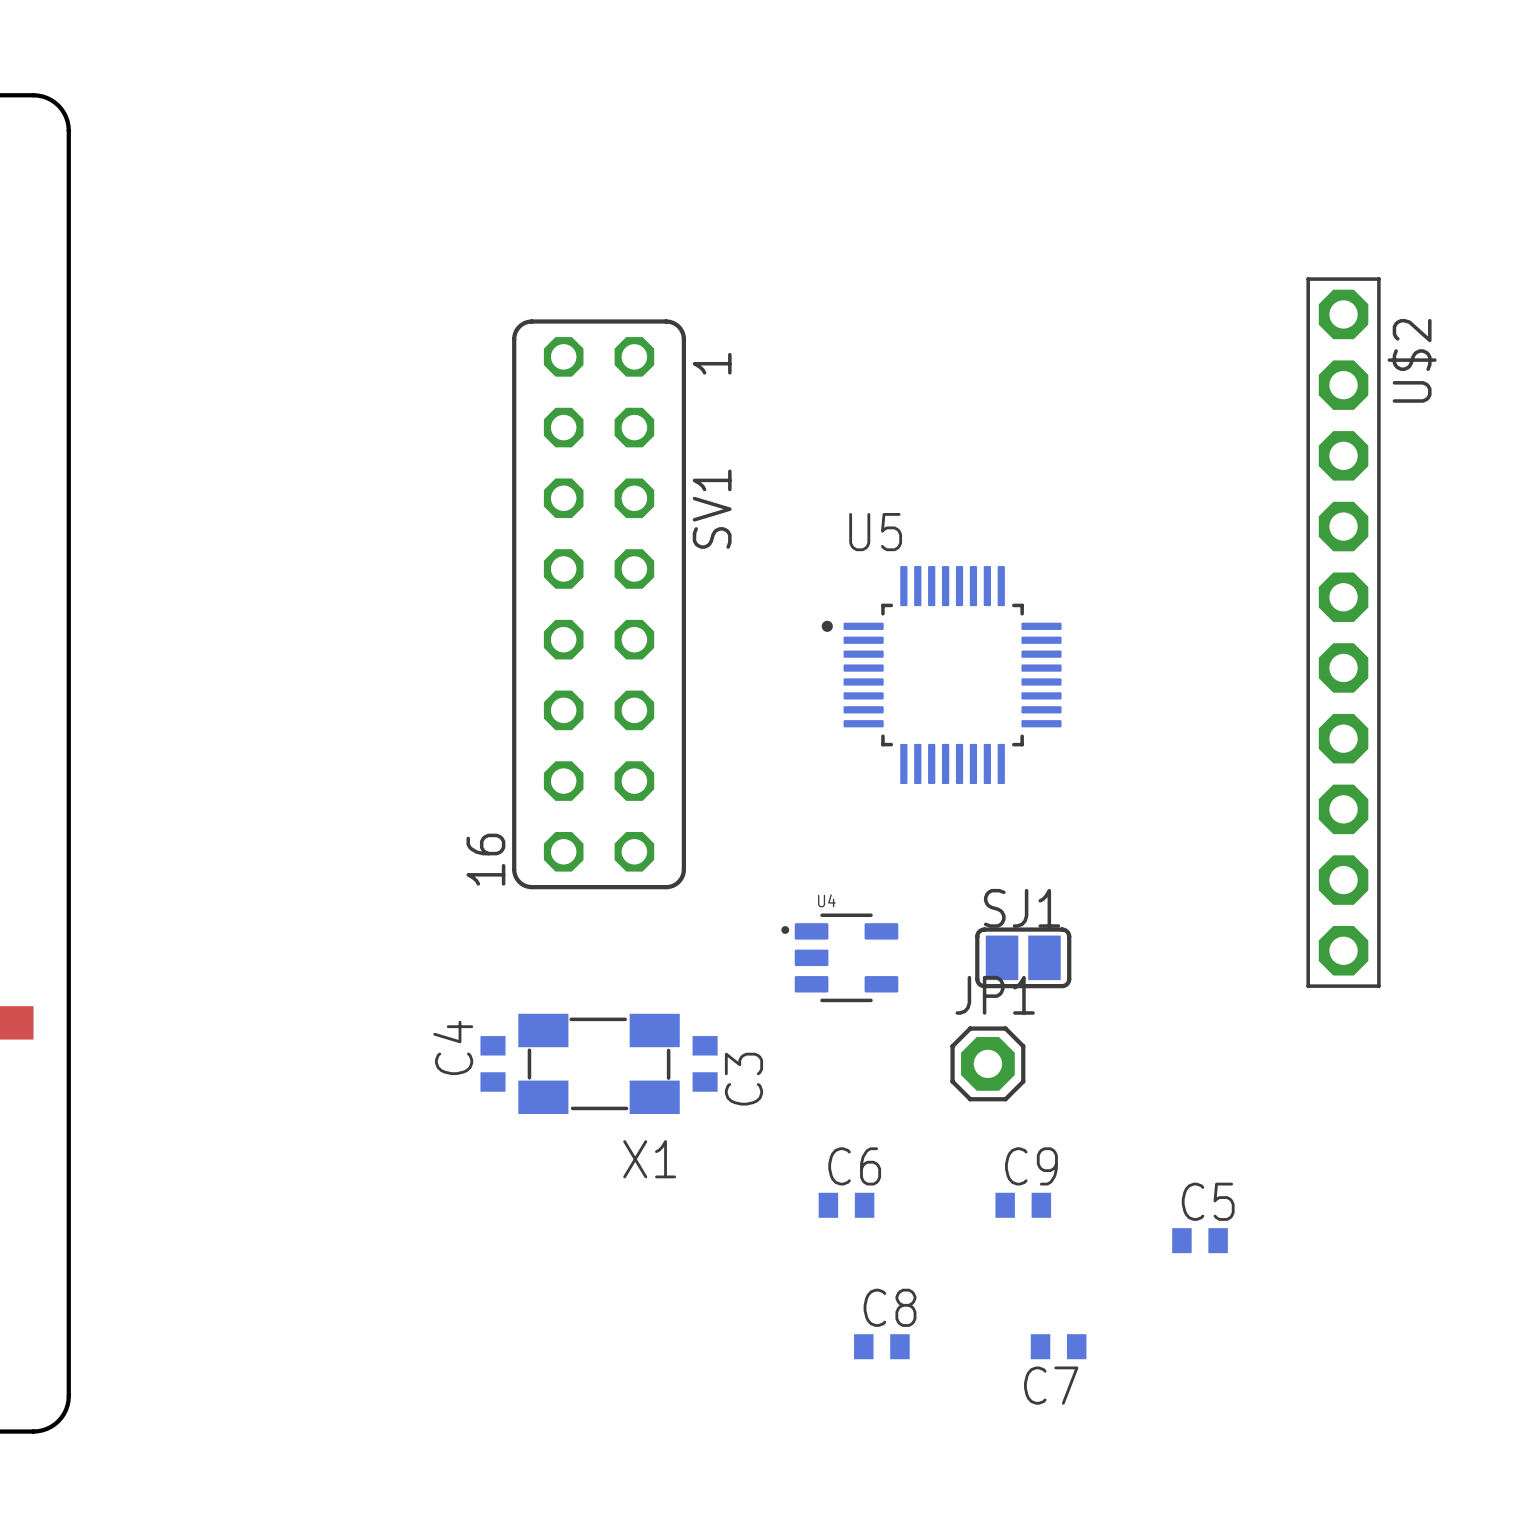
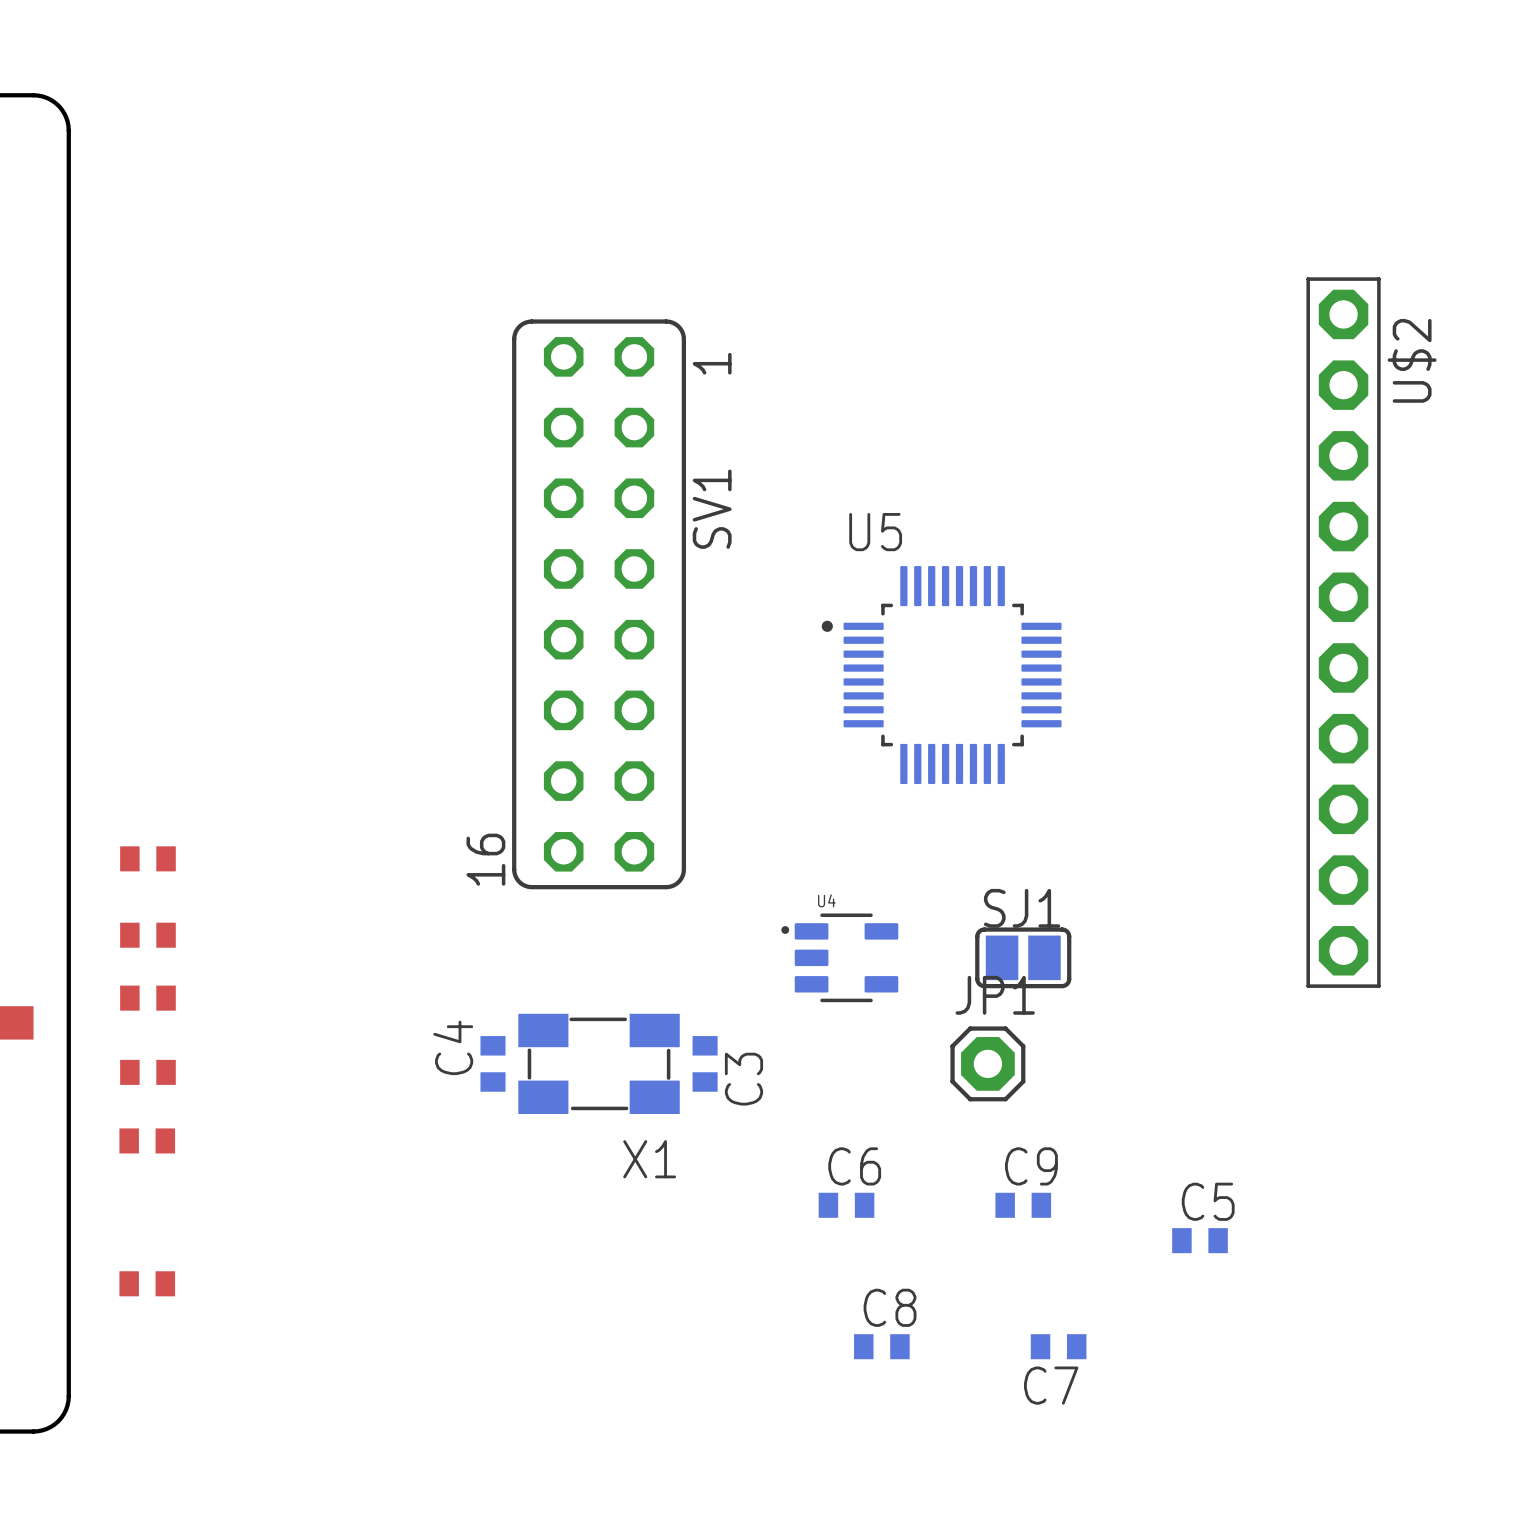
part: none -> (147, 858)
part: none -> (147, 935)
part: none -> (147, 998)
part: none -> (147, 1072)
part: none -> (147, 1140)
part: none -> (147, 1283)

